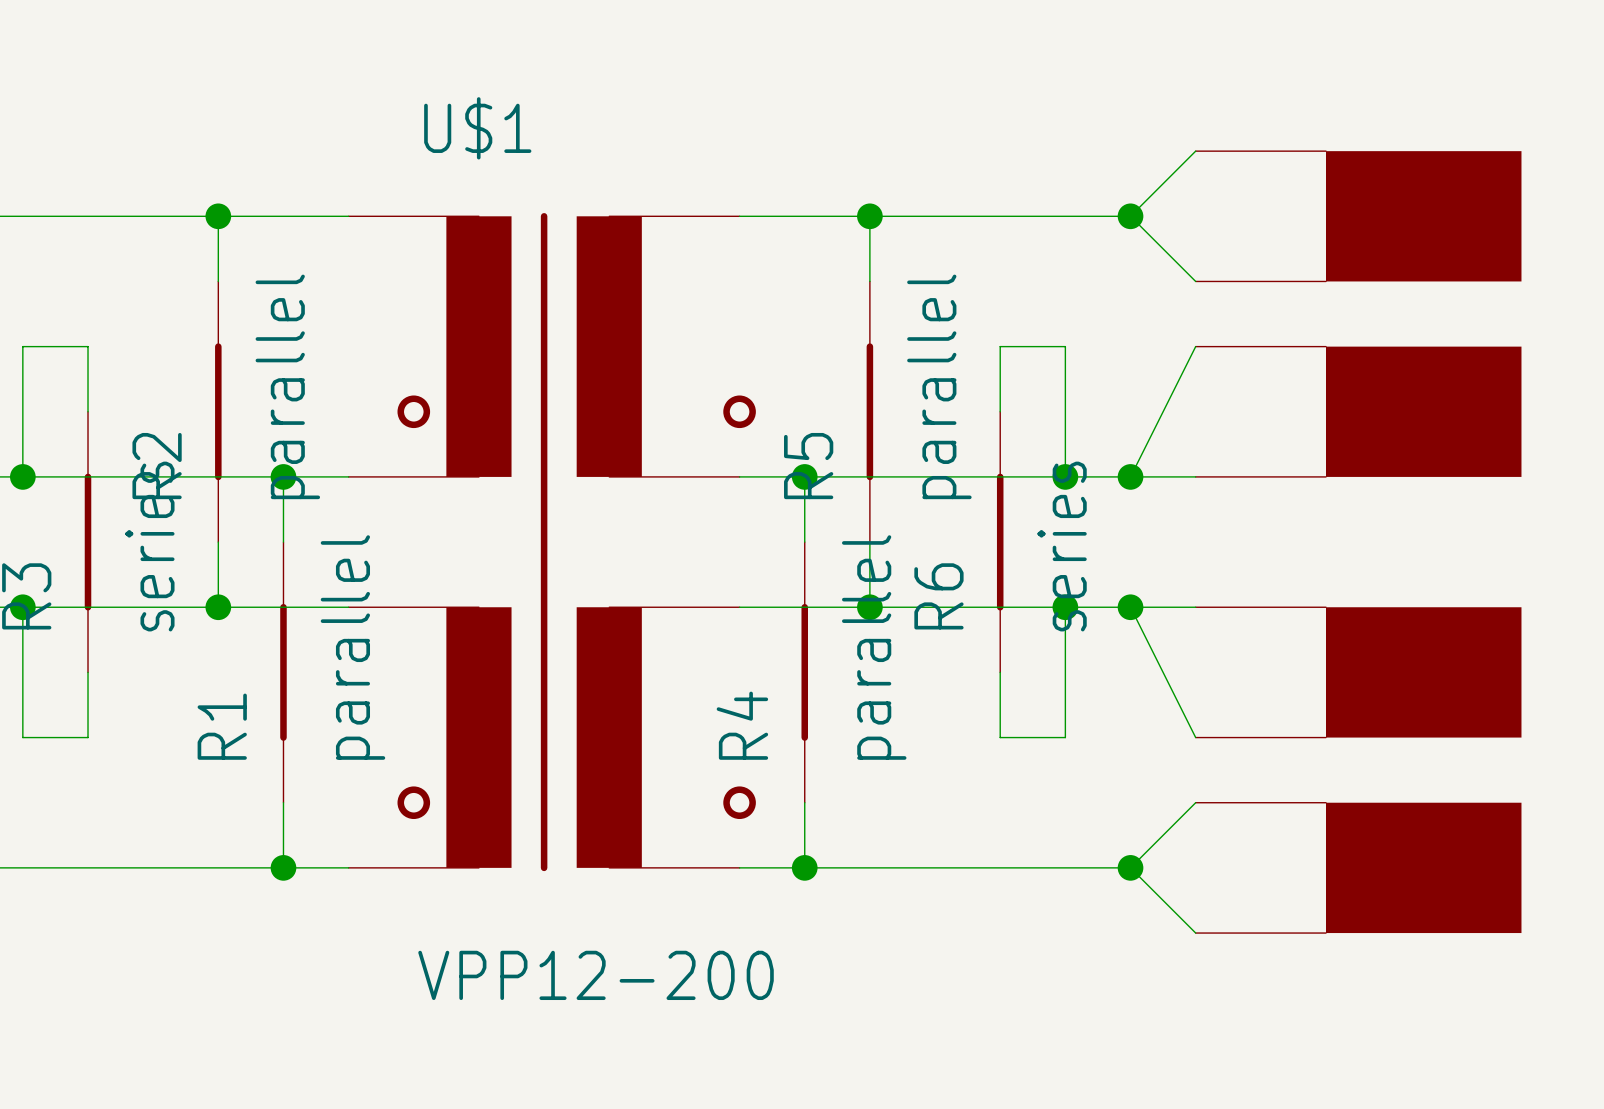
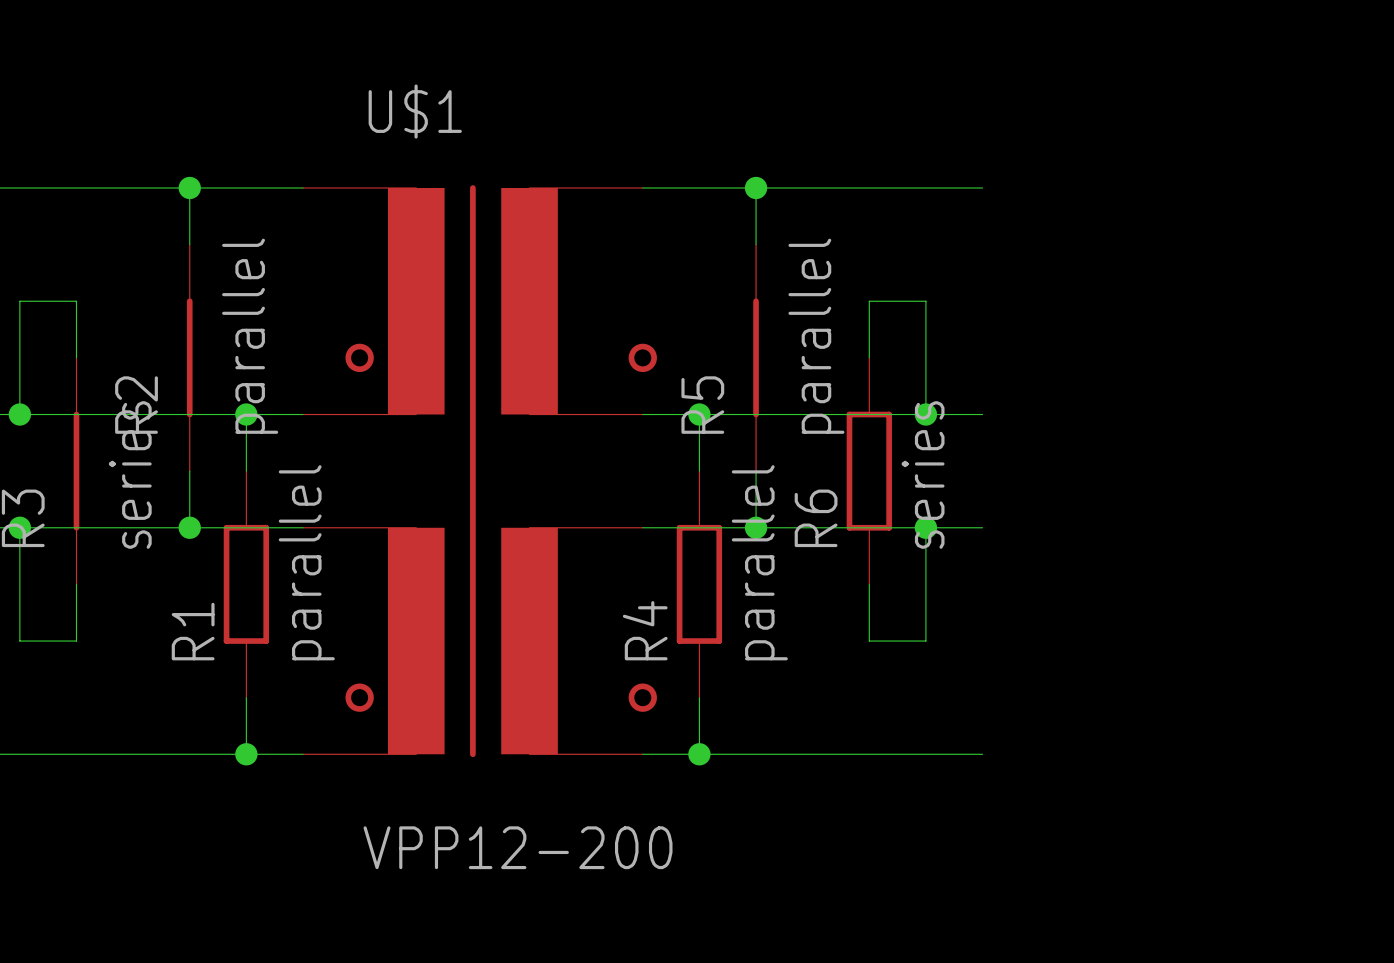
wire: (1195, 151) (1130, 216) (1195, 281) -> none
junction: (1130, 216) -> none
part: (1358, 216) -> none
wire: (1195, 346) (1130, 476) (1195, 476) -> none
R6 symbol: [996, 411, 1004, 673] -> [846, 357, 892, 585]
part: (1358, 411) -> none
junction: (1130, 476) -> none
R1 symbol: [280, 542, 287, 803] -> [223, 471, 270, 698]
R4 symbol: [801, 542, 808, 803] -> [676, 471, 723, 698]
junction: (1130, 607) -> none
wire: (1195, 607) (1130, 607) (1195, 737) -> none
part: (1358, 672) -> none
wire: (1195, 802) (1130, 867) (1195, 933) -> none
junction: (1130, 867) -> none
part: (1358, 867) -> none

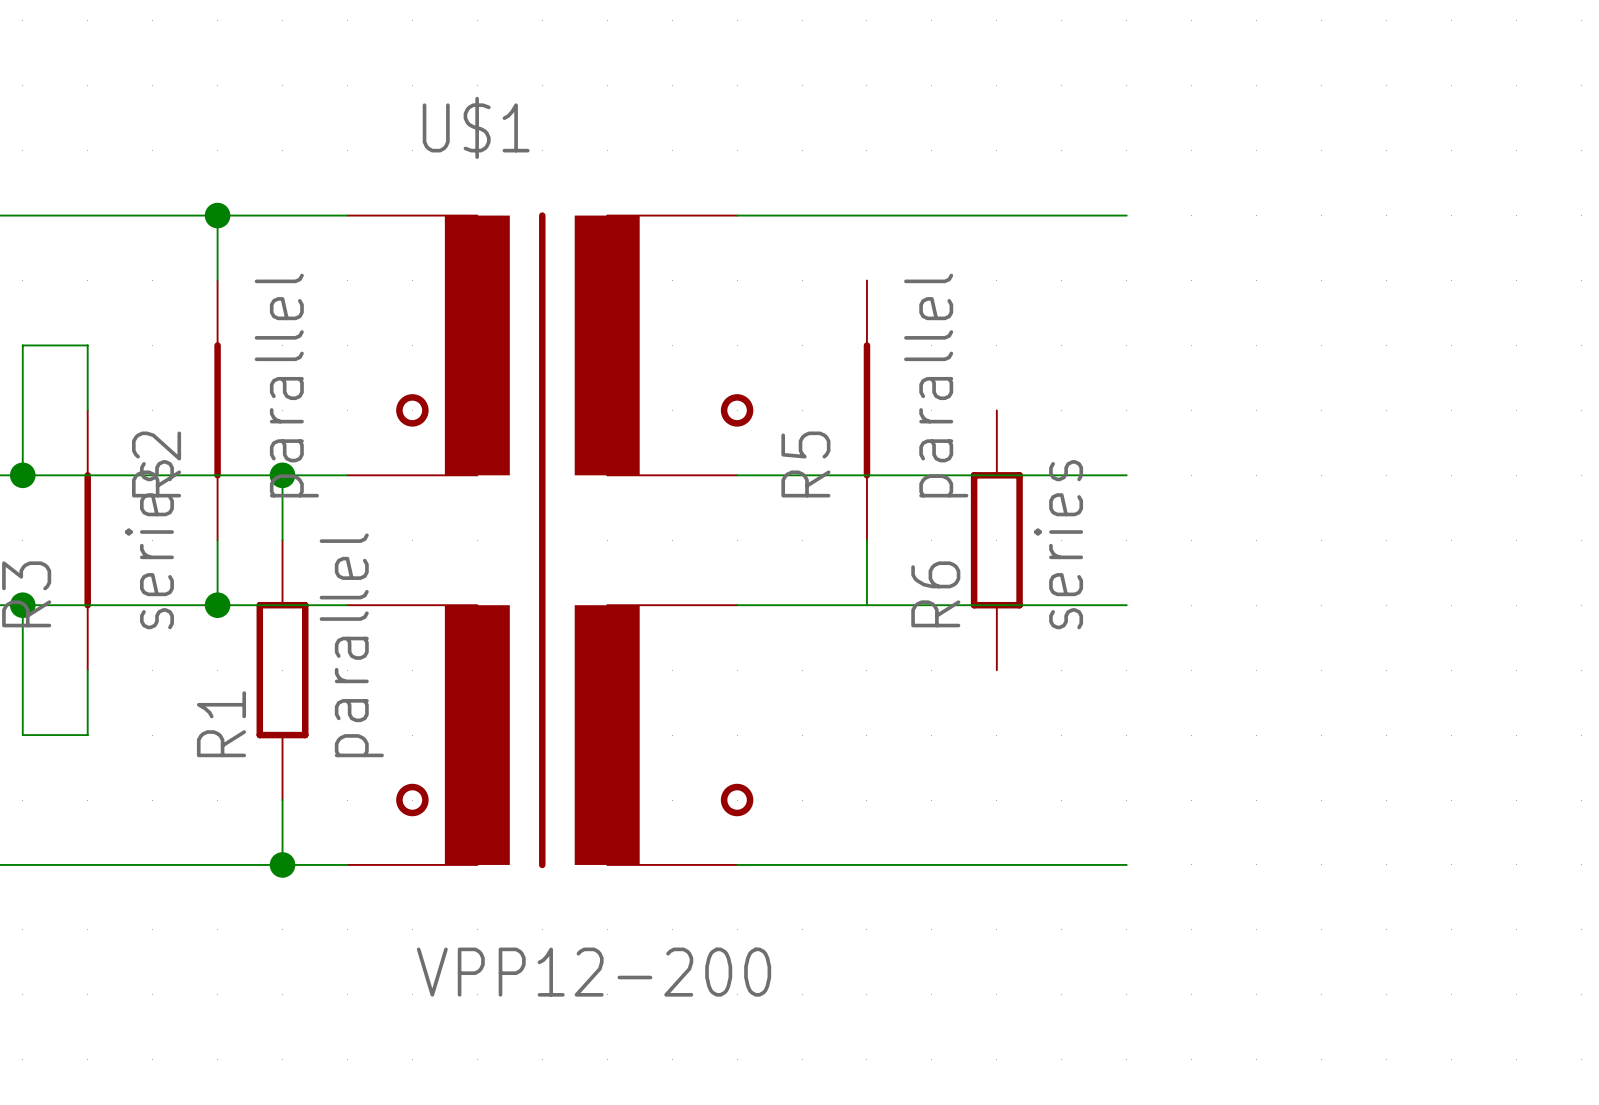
wire: (756, 187) (756, 244) -> none
junction: (756, 187) -> none
wire: (869, 357) (869, 301) (925, 301) (925, 414) -> none
wire: (699, 414) (699, 471) -> none
junction: (699, 414) -> none
junction: (925, 414) -> none
junction: (756, 527) -> none
wire: (925, 527) (925, 641) (869, 641) (869, 584) -> none
junction: (925, 527) -> none
R4: parallel (699, 584) -> none
wire: (699, 697) (699, 754) -> none
junction: (699, 754) -> none

